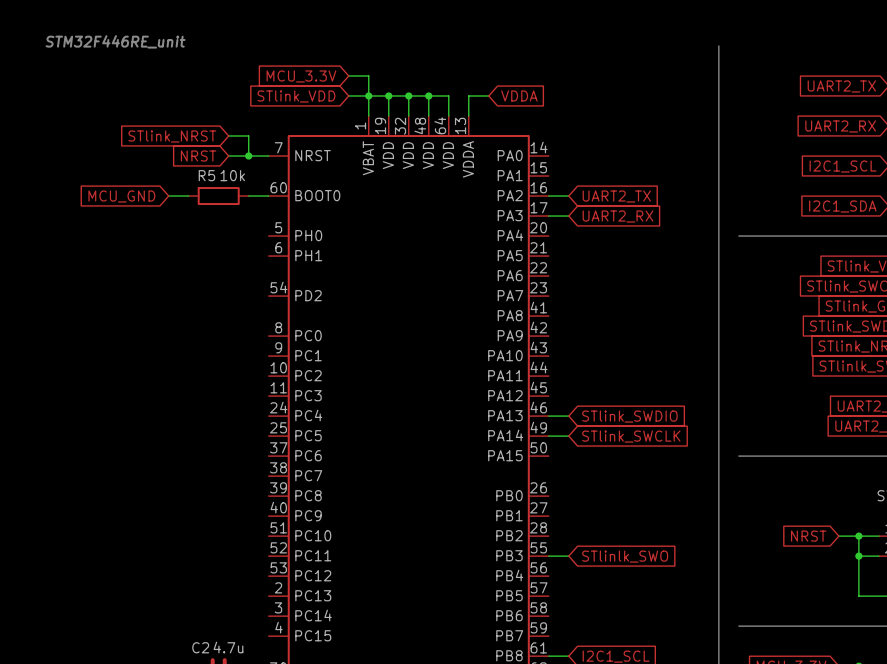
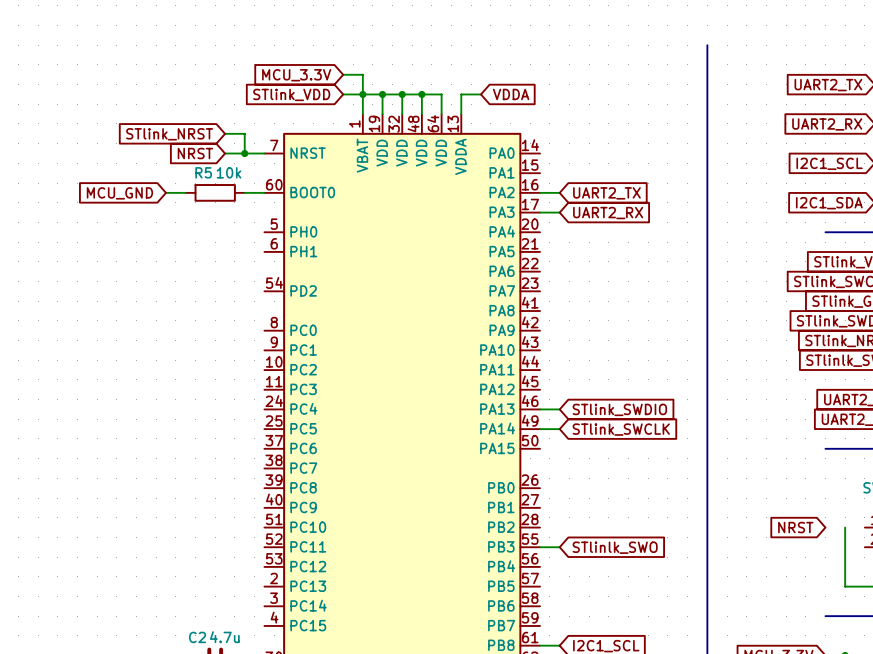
text: STM32F446RE_unit (115, 41) -> none
line: (738, 236) (838, 236) -> none
line: (738, 456) (838, 456) -> none
wire: (838, 536) (878, 536) -> none
junction: (858, 536) -> none
wire: (858, 556) (878, 556) -> none
junction: (858, 556) -> none
line: (738, 626) (838, 626) -> none

